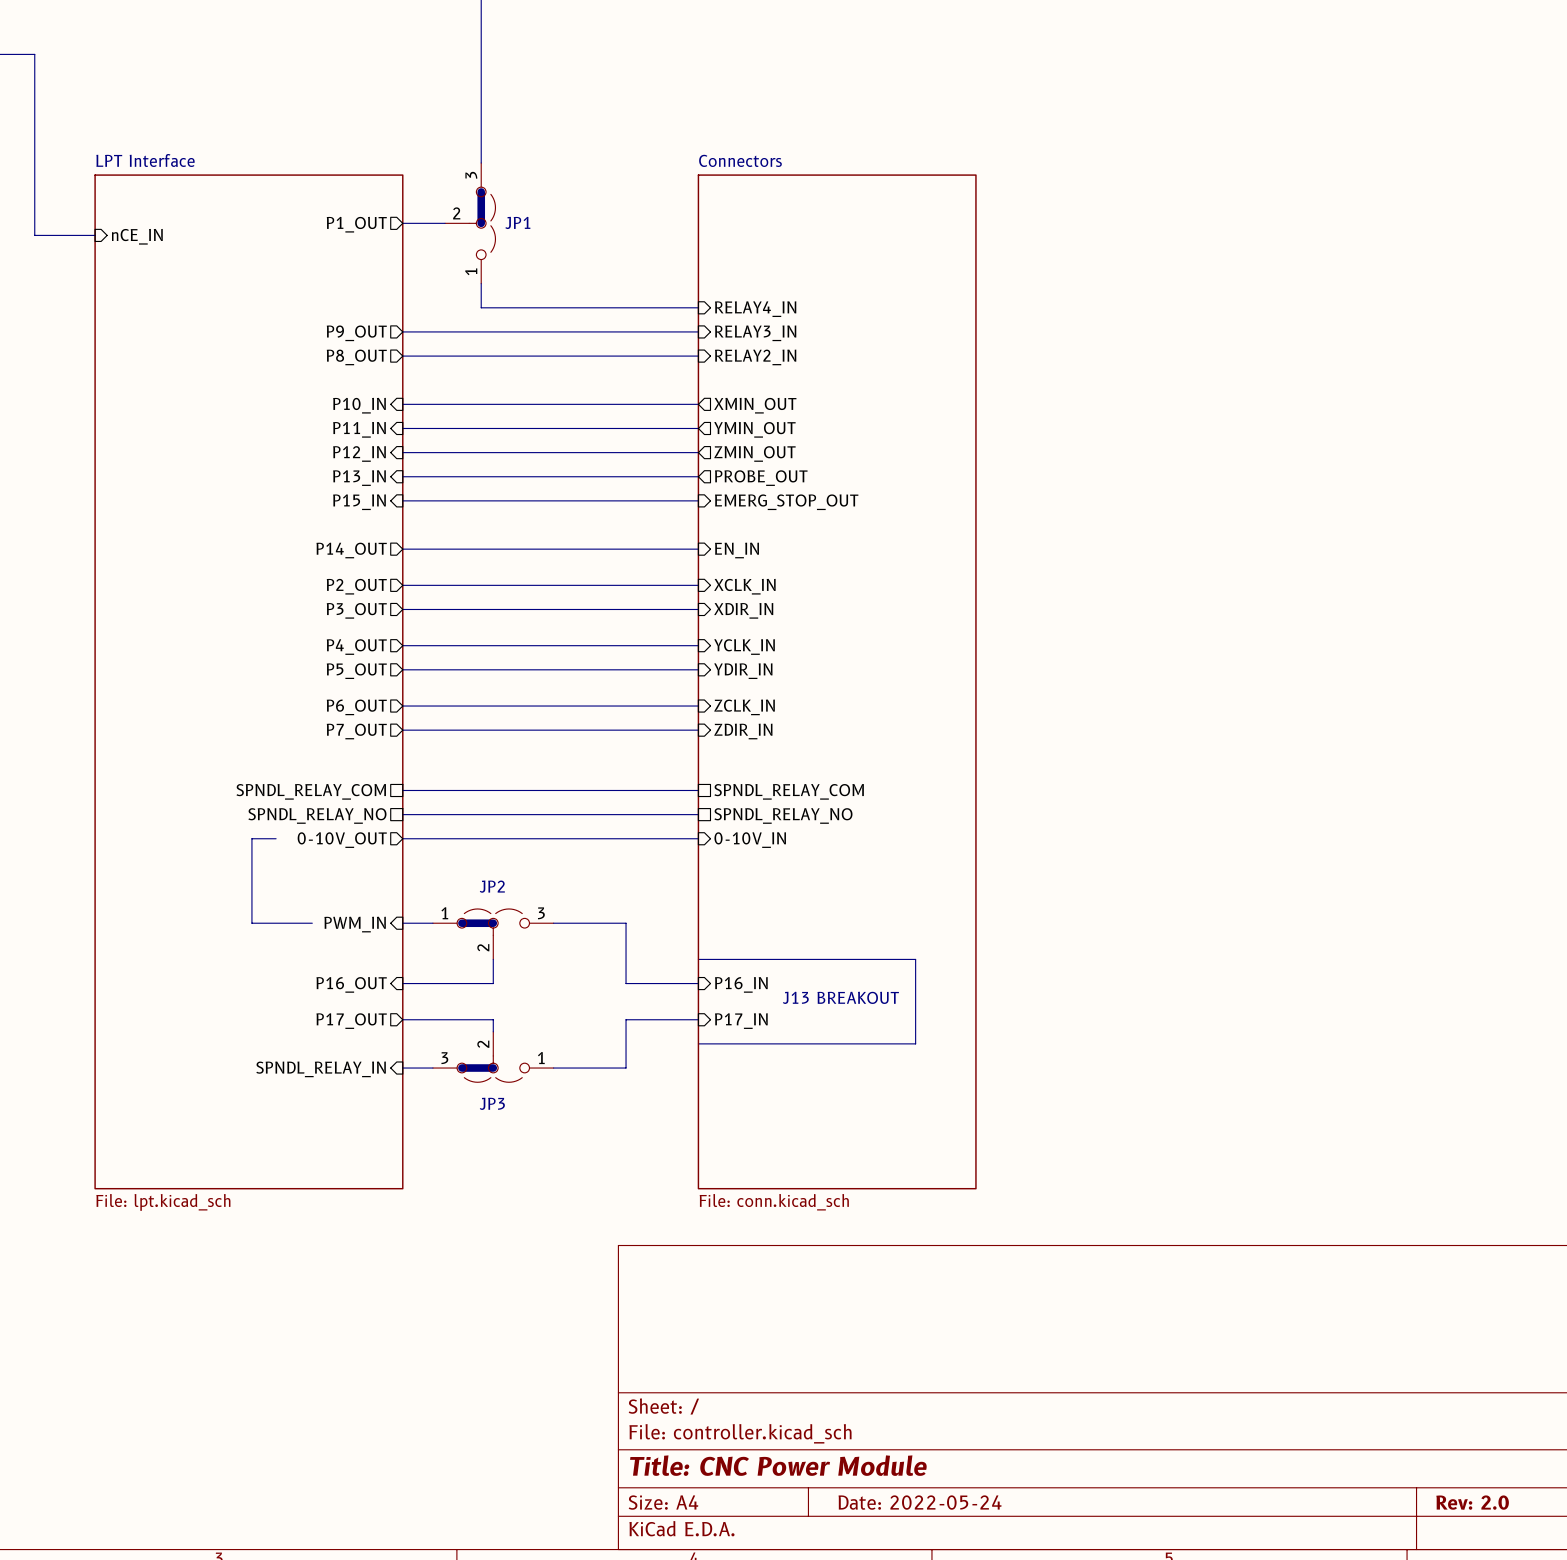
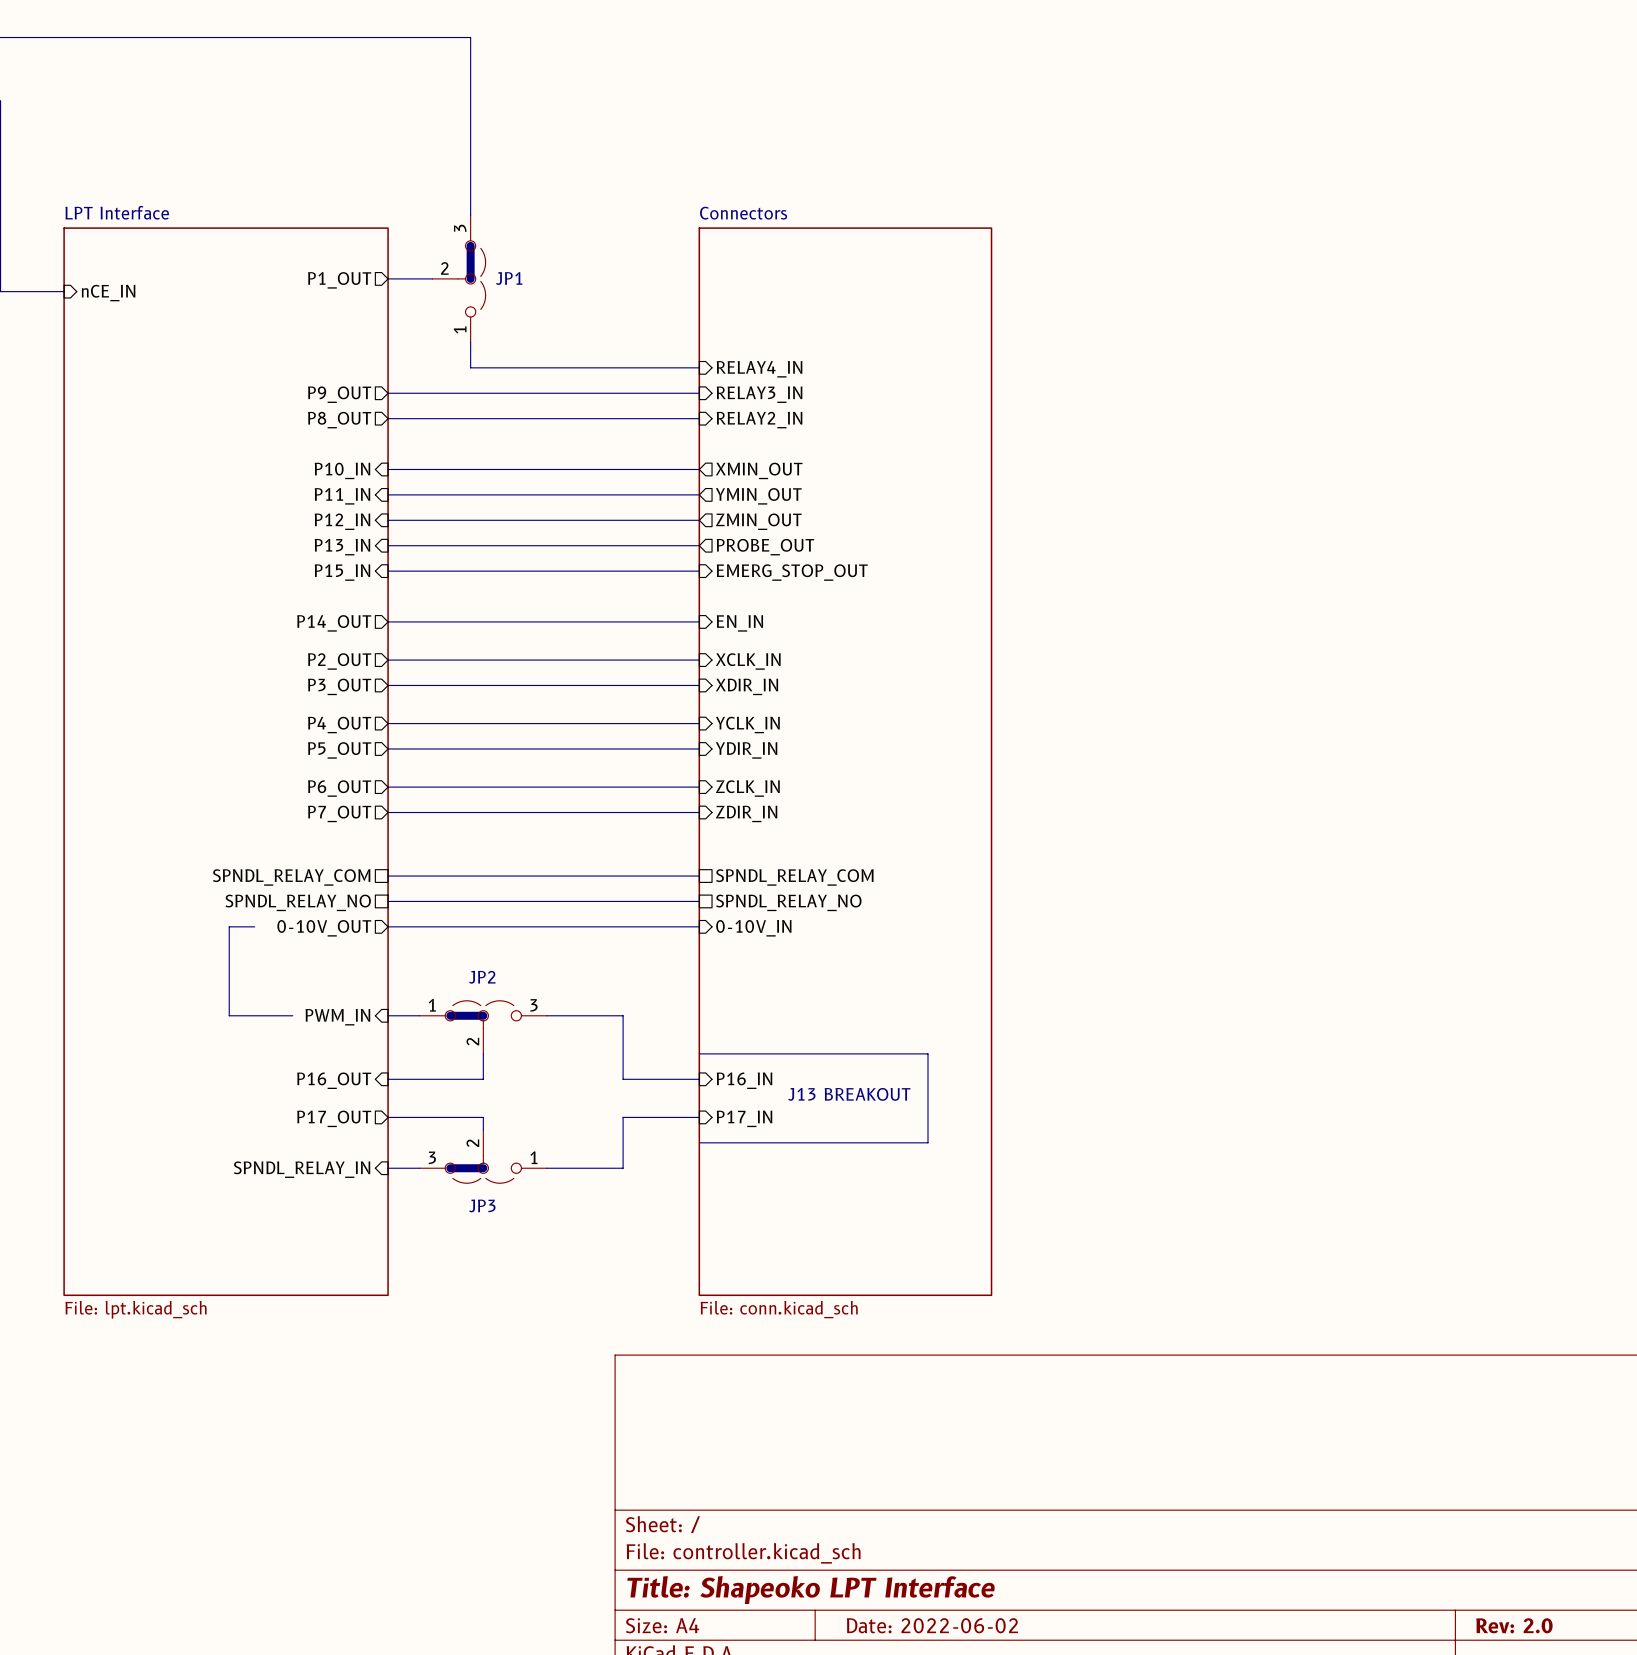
title block: Title: CNC Power Module (778, 1465) -> Title: Shapeoko LPT Interface (811, 1590)
title block: Date: 2022-05-24 (920, 1502) -> Date: 2022-06-02 (932, 1625)

